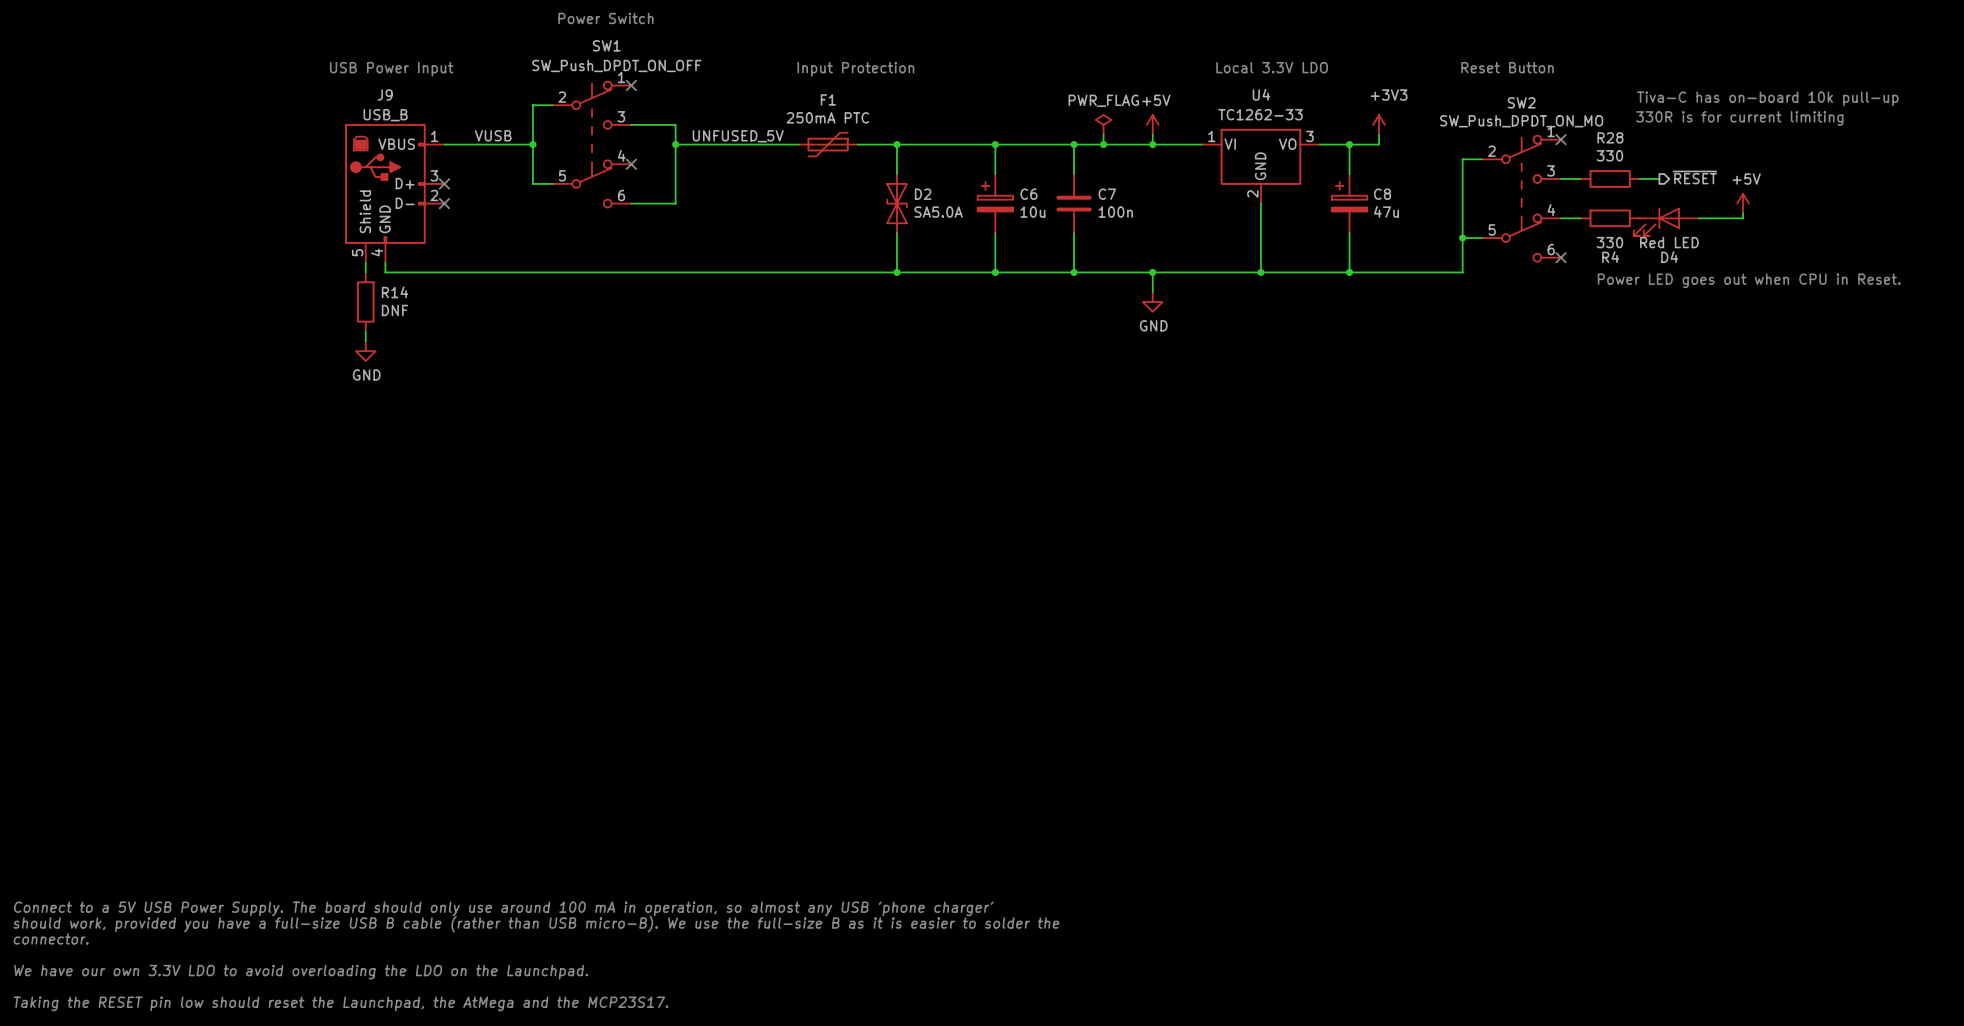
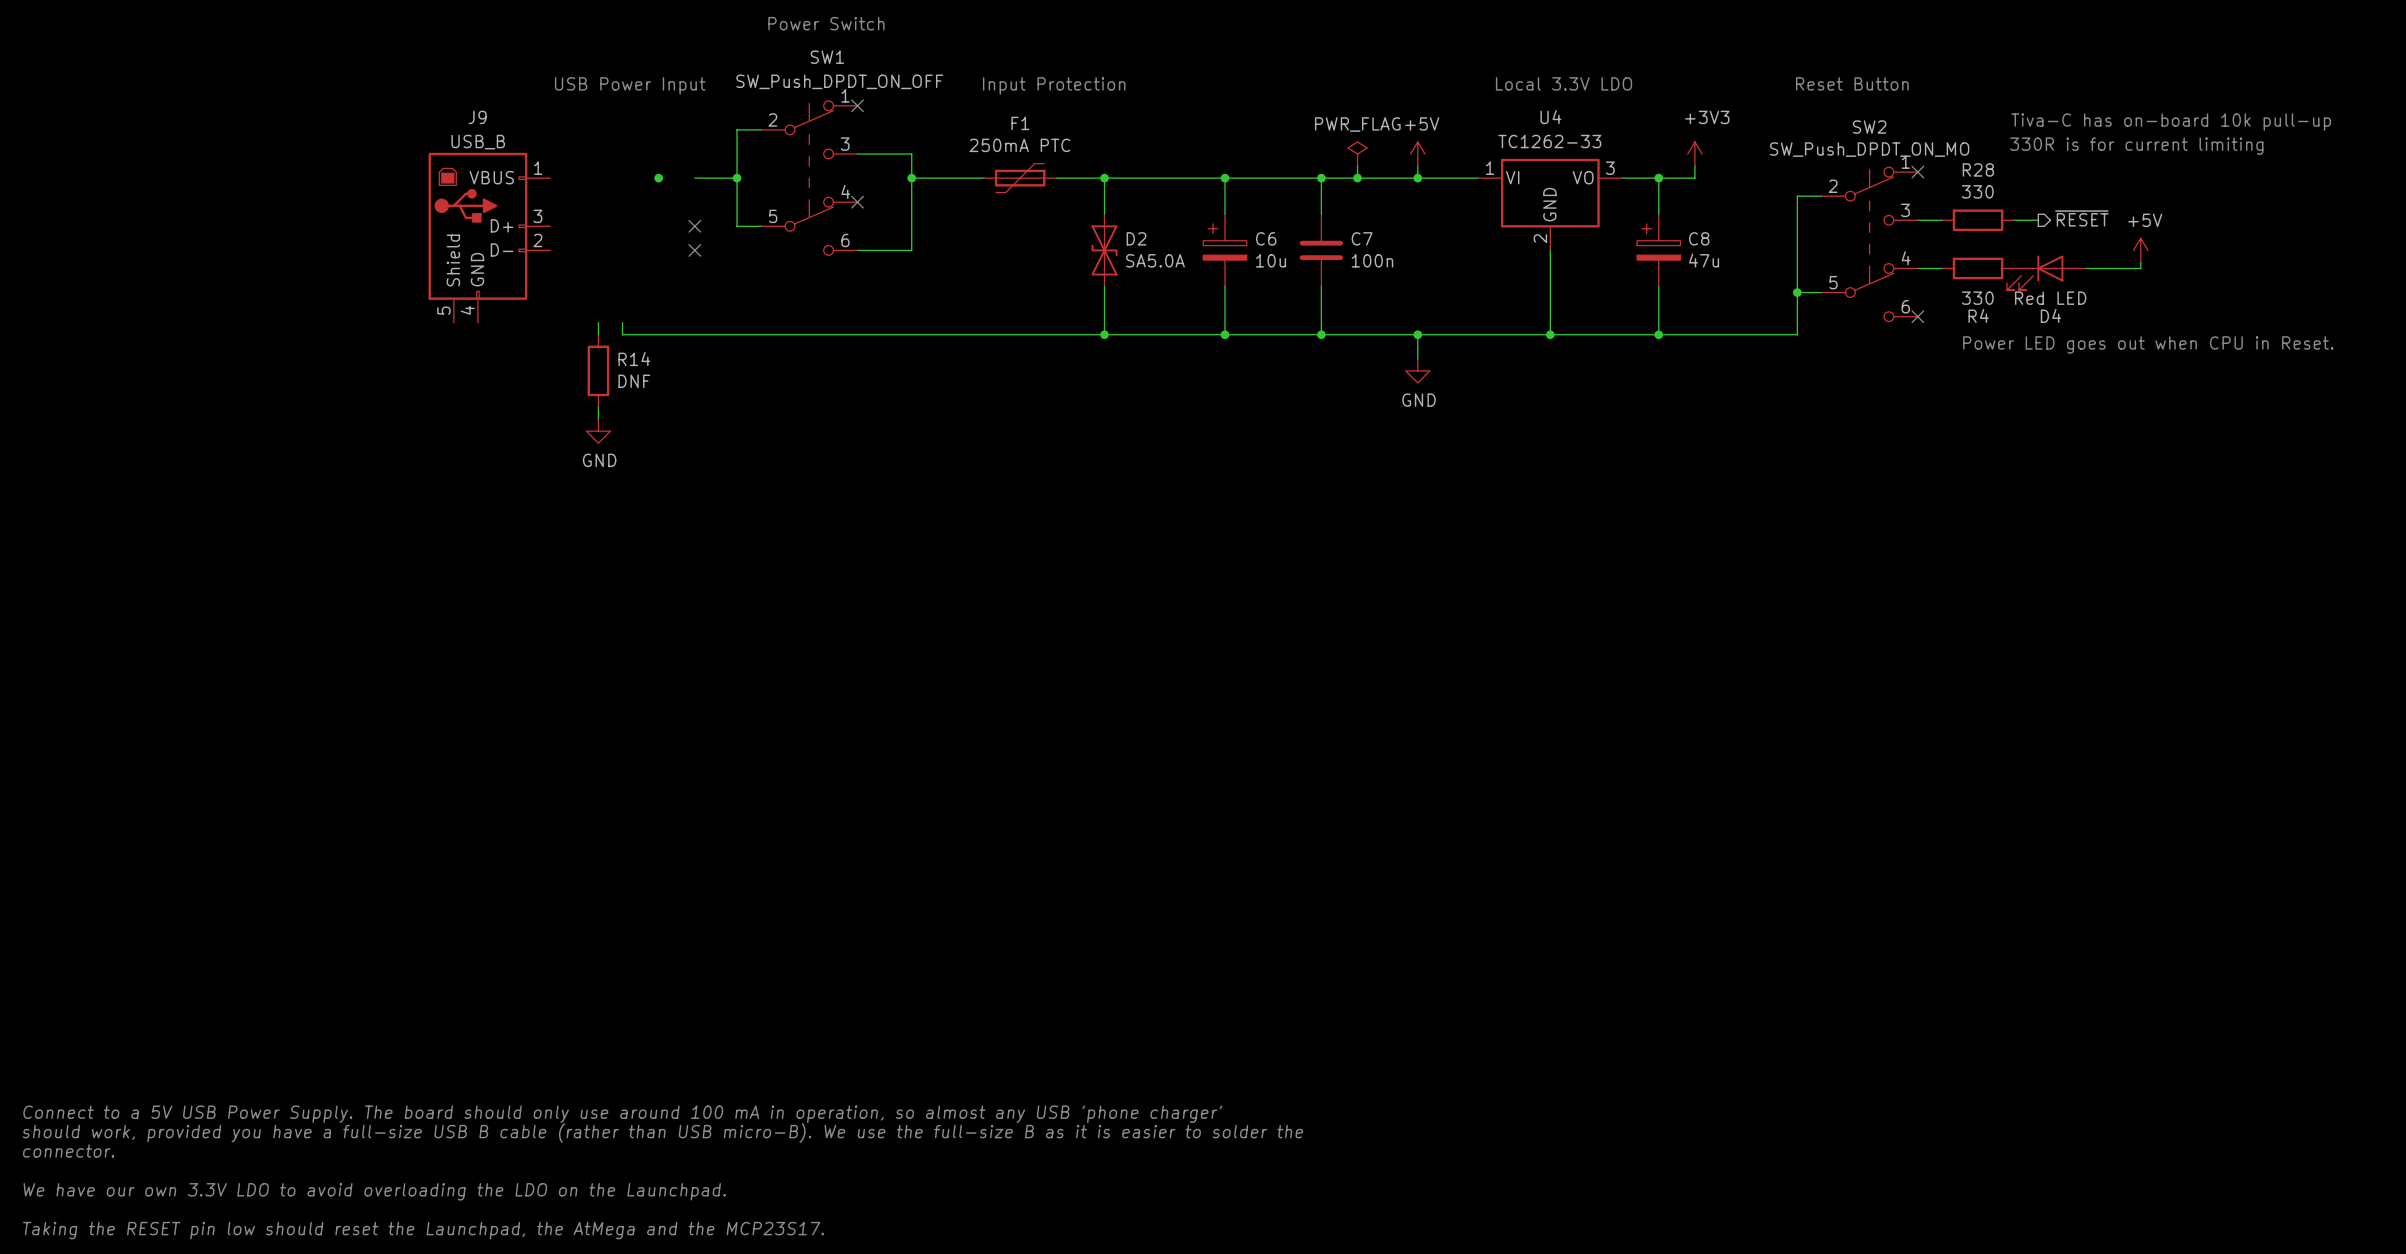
text position: Power Switch (605, 18) -> Power Switch (826, 23)
text position: USB Power Input (391, 69) -> USB Power Input (630, 85)
no-connect mark: (631, 85) -> none
no-connect mark: none -> (857, 105)
wire: (552, 105) (532, 105) (532, 183) (552, 183) -> (761, 129) (737, 129) (737, 226) (761, 226)
wire: (631, 124) (675, 124) (675, 203) (631, 203) -> (857, 154) (911, 154) (911, 250) (857, 250)
label: VUSB (493, 135) -> none
label: UNFUSED_5V (738, 136) -> none
wire: (444, 144) (532, 144) -> none
wire: none -> (694, 178) (737, 178)
SW1 position: (592, 144) -> (809, 178)
junction: none -> (737, 178)
wire: (675, 144) (739, 144) -> none
junction: (675, 144) -> none
junction: none -> (911, 178)
no-connect mark: (631, 164) -> none
no-connect mark: none -> (857, 202)
no-connect mark: (444, 183) -> none
no-connect mark: none -> (694, 226)
no-connect mark: (444, 203) -> none
no-connect mark: none -> (694, 250)
wire: (365, 262) (365, 272) -> (598, 322) (598, 334)
wire: (385, 262) (385, 272) (503, 272) -> (622, 322) (622, 334)
R14 position: (365, 301) -> (598, 370)
wire: (365, 331) (365, 341) -> (598, 407) (598, 419)
power symbol position: GND (365, 351) -> GND (598, 431)

